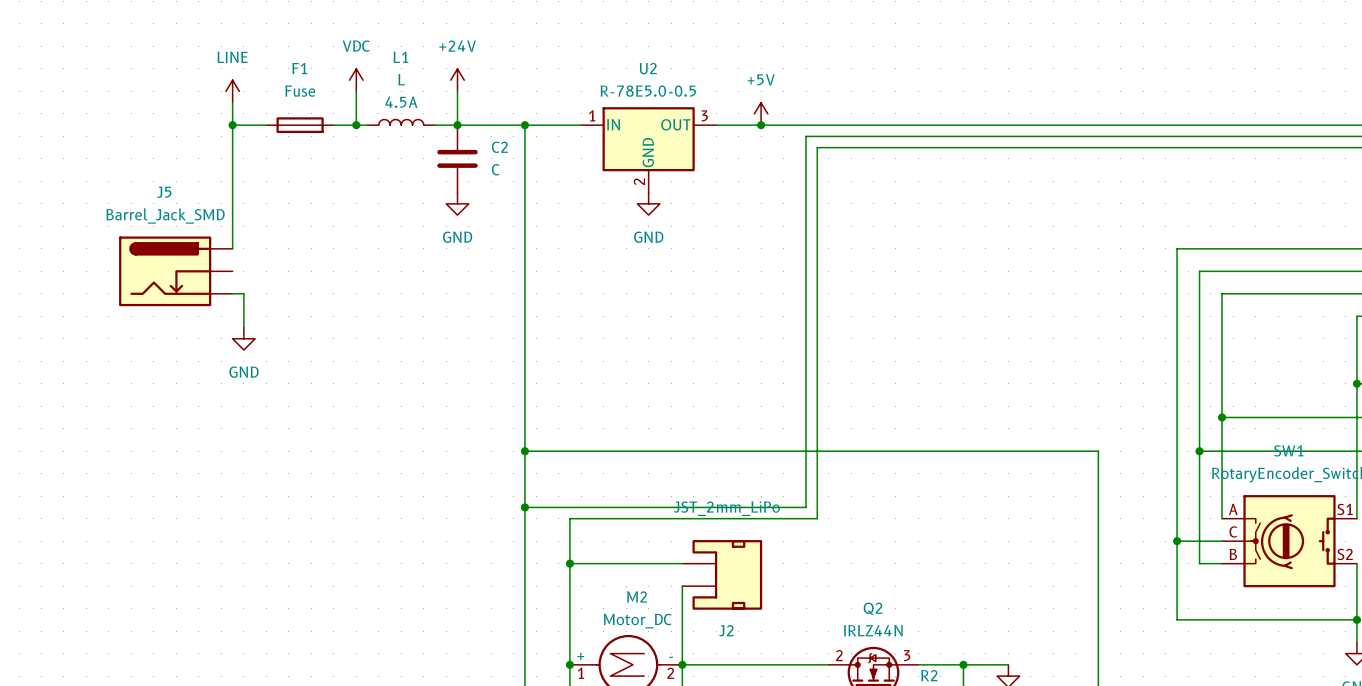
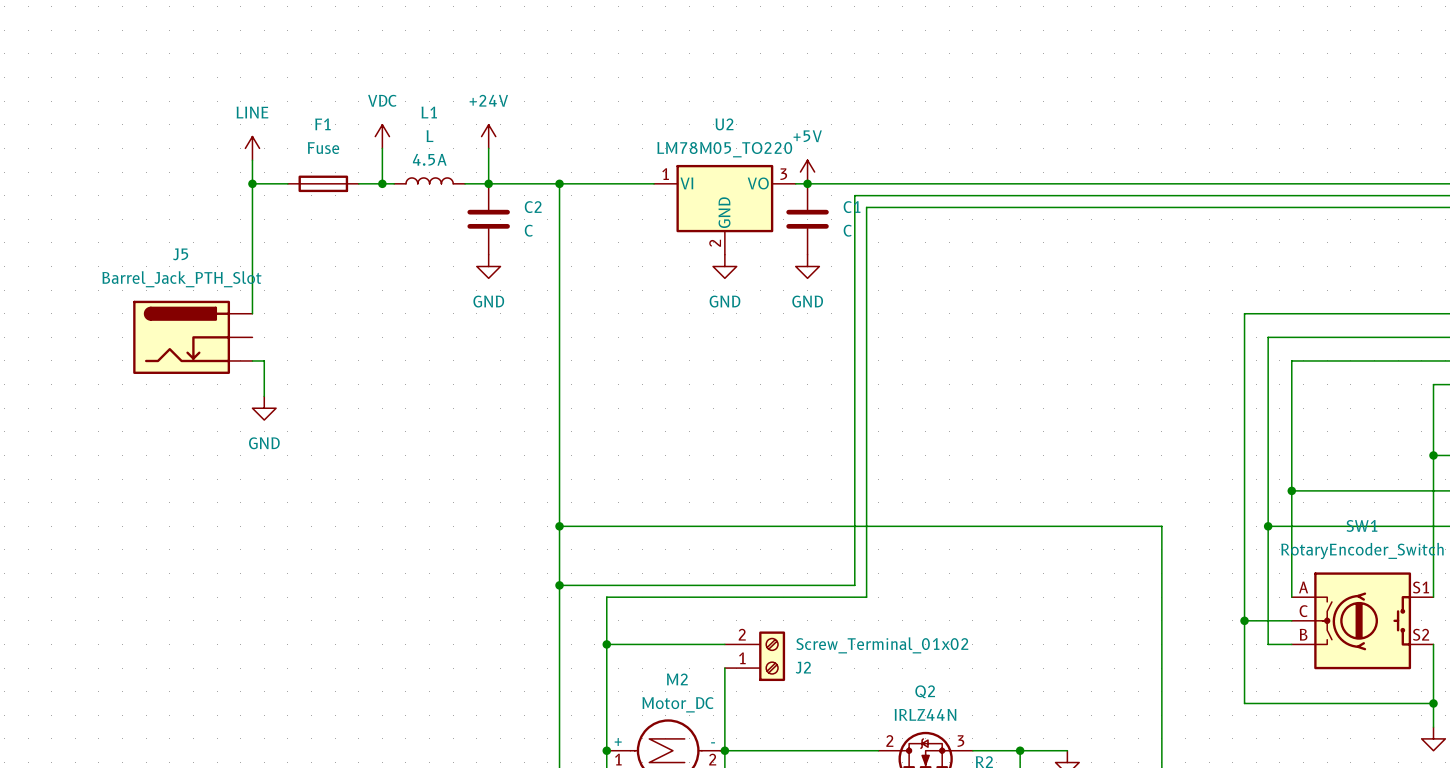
U2 value: R-78E5.0-0.5 (648, 91) -> LM78M05_TO220 (724, 149)
U2 pin name: IN (613, 124) -> VI (686, 183)
U2 pin name: OUT (675, 124) -> VO (758, 183)
U2 position: (648, 149) -> (724, 209)
C1: none -> C (807, 219)
power symbol position: GND (648, 203) -> GND (724, 266)
power symbol: none -> GND (807, 266)
J5 value: Barrel_Jack_SMD (165, 216) -> Barrel_Jack_PTH_Slot (181, 279)
J2 value: JST_2mm_LiPo (726, 508) -> Screw_Terminal_01x02 (882, 645)
J2 symbol: [682, 540, 763, 610] -> [724, 631, 786, 682]
J2 name position: J2 (726, 630) -> J2 (803, 667)

